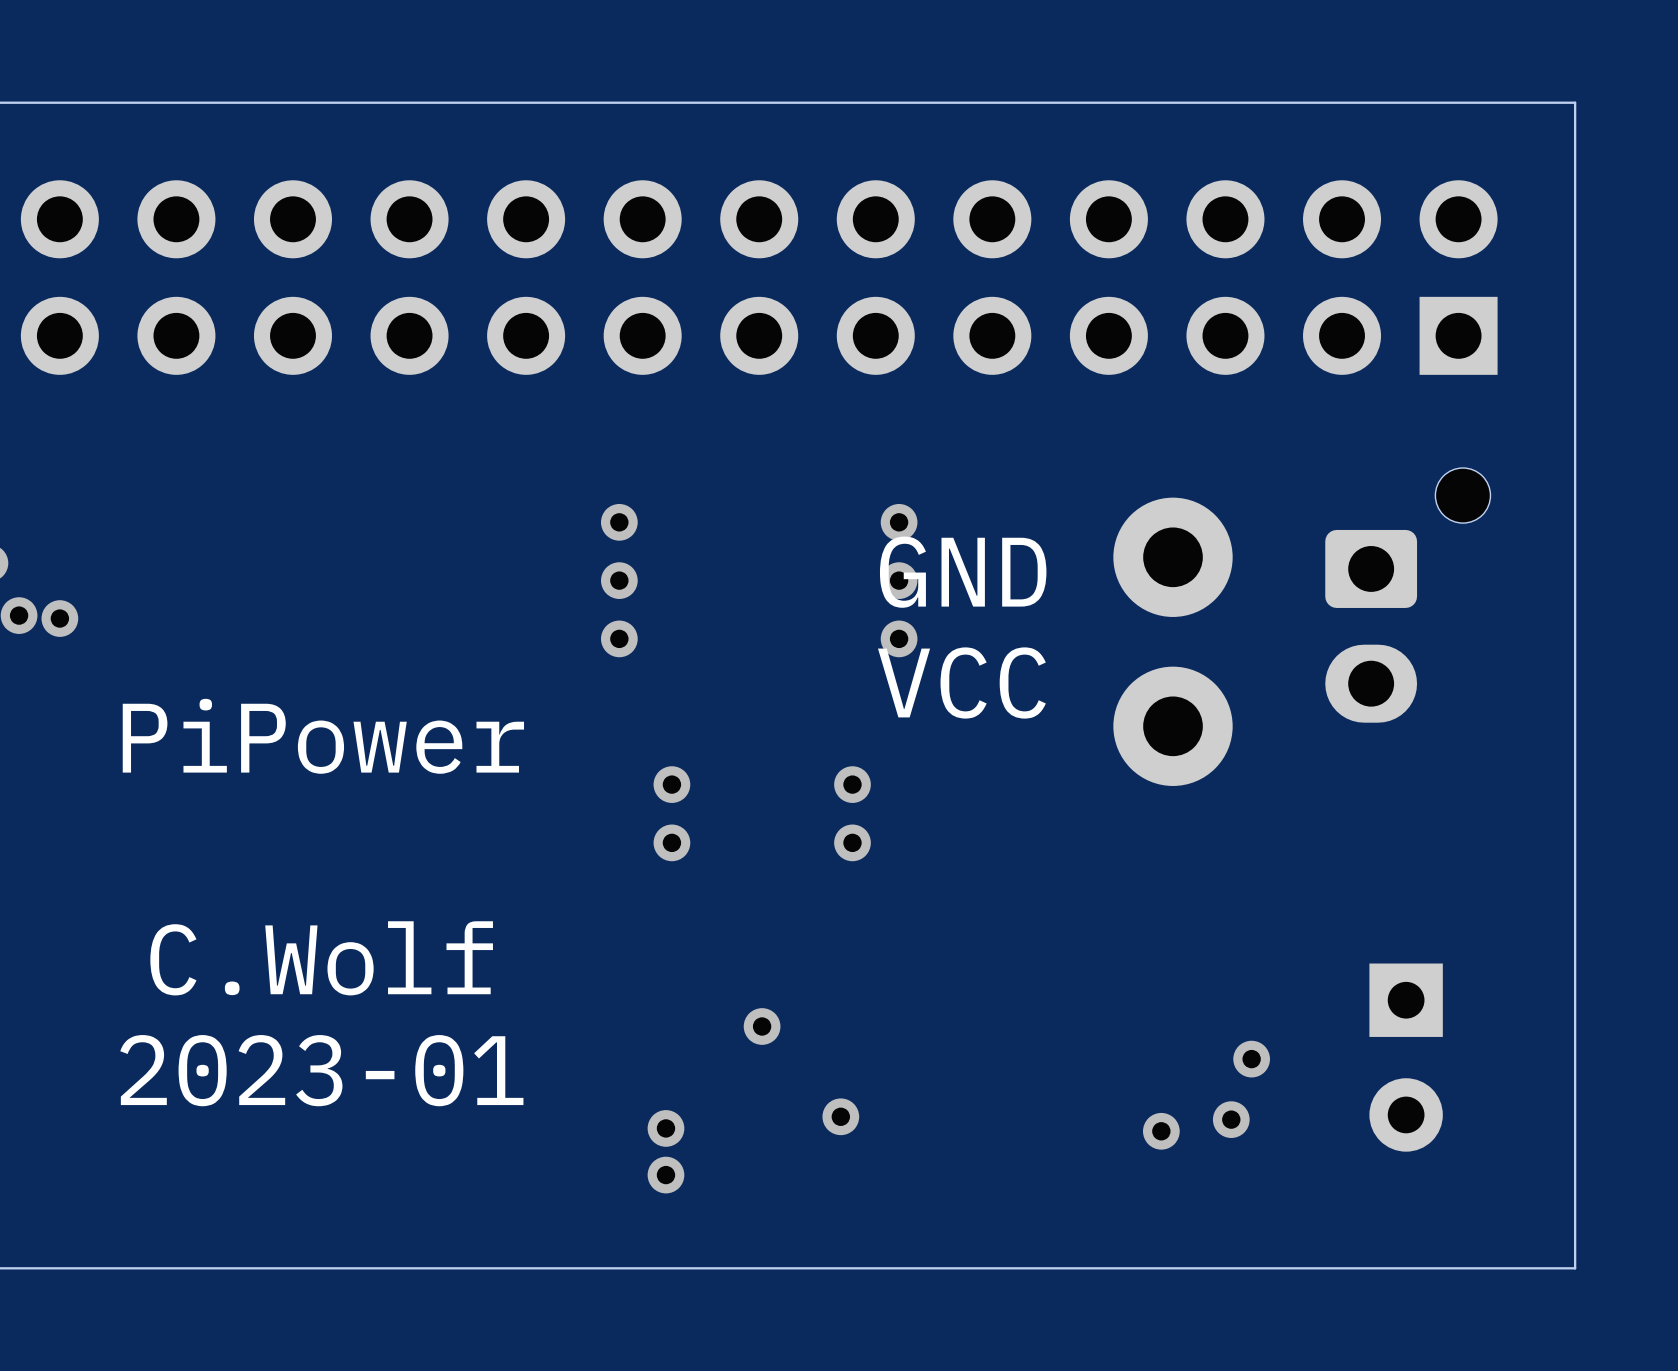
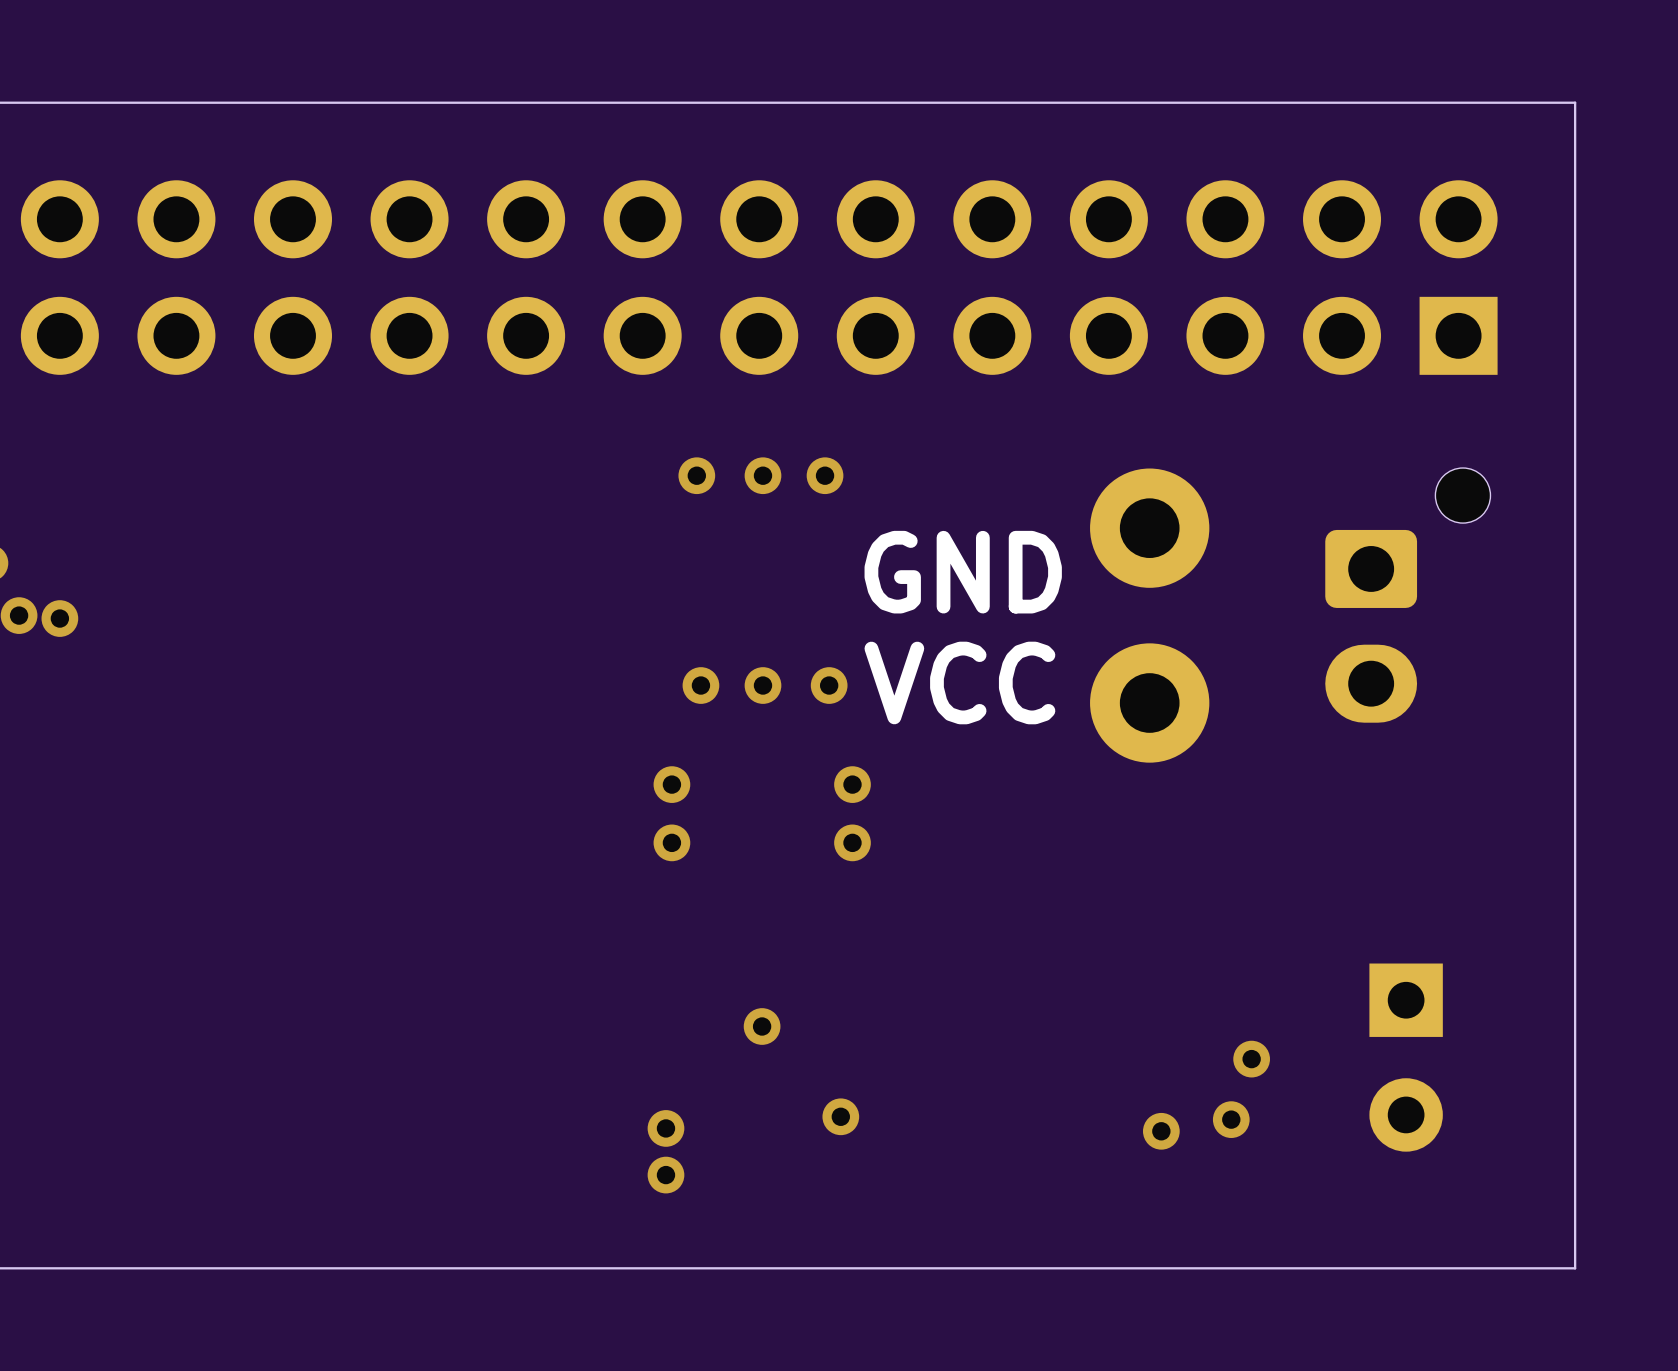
via: none -> (696, 475)
via: none -> (762, 475)
via: none -> (825, 475)
via: (619, 522) -> none
via: (899, 522) -> none
part position: (1173, 557) -> (1149, 528)
via: (619, 580) -> none
via: (899, 580) -> none
via: (619, 638) -> none
via: (899, 638) -> none
via: none -> (700, 685)
via: none -> (762, 685)
via: none -> (829, 685)
part position: (1173, 726) -> (1149, 703)
text: PiPower (323, 736) -> none
text: C.Wolf (321, 958) -> none
text: 2023-01 (321, 1070) -> none

